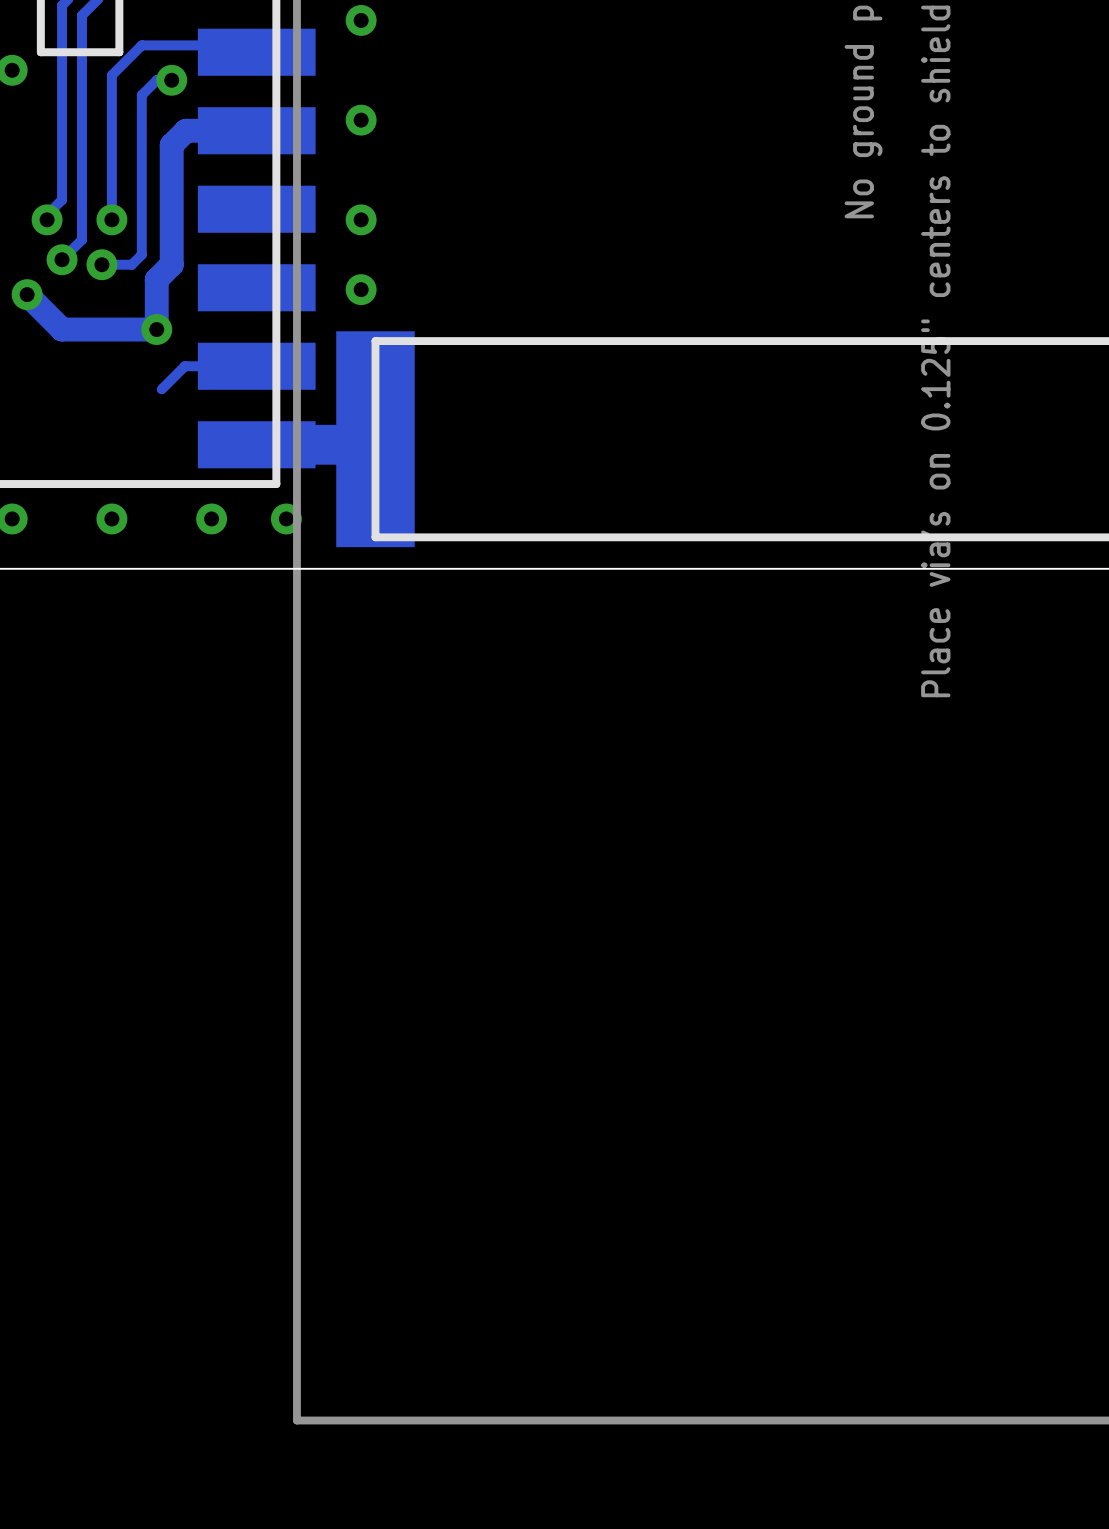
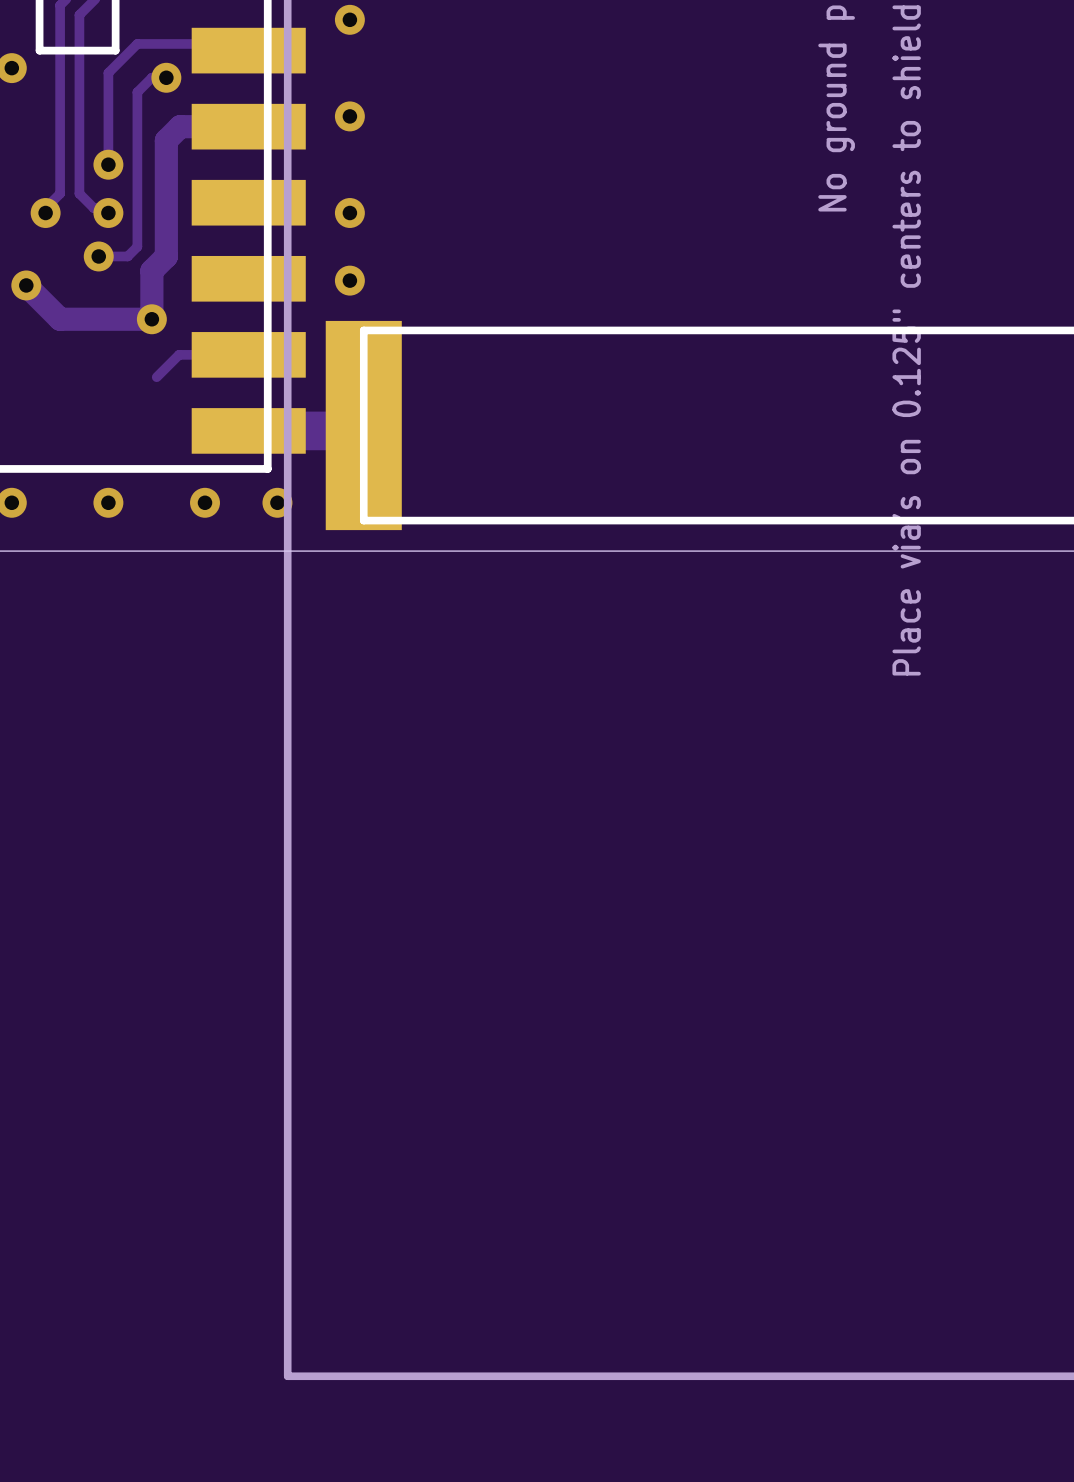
track: (111, 170) (111, 219) -> none
track: (81, 199) (81, 239) (62, 259) -> (79, 193) (93, 208) (108, 208)
via position: (62, 259) -> (108, 164)

